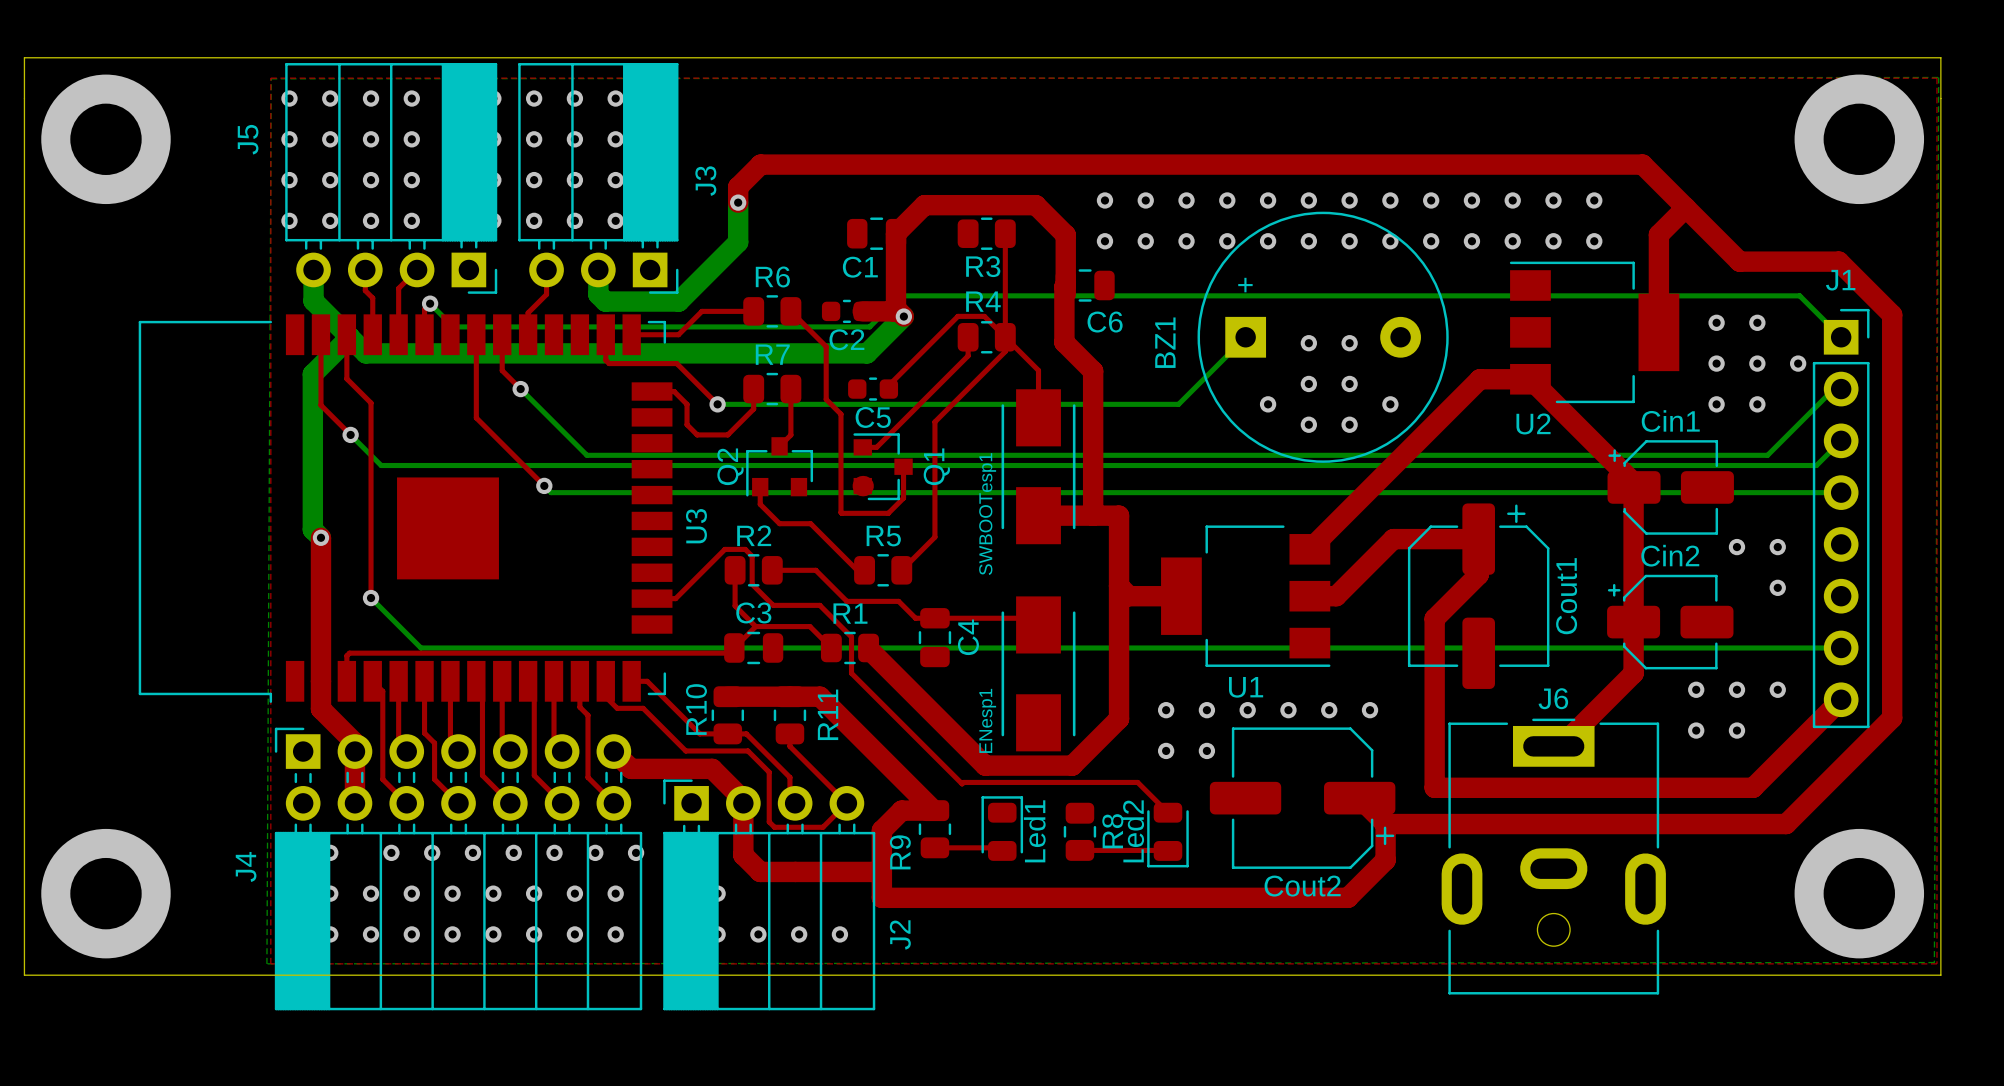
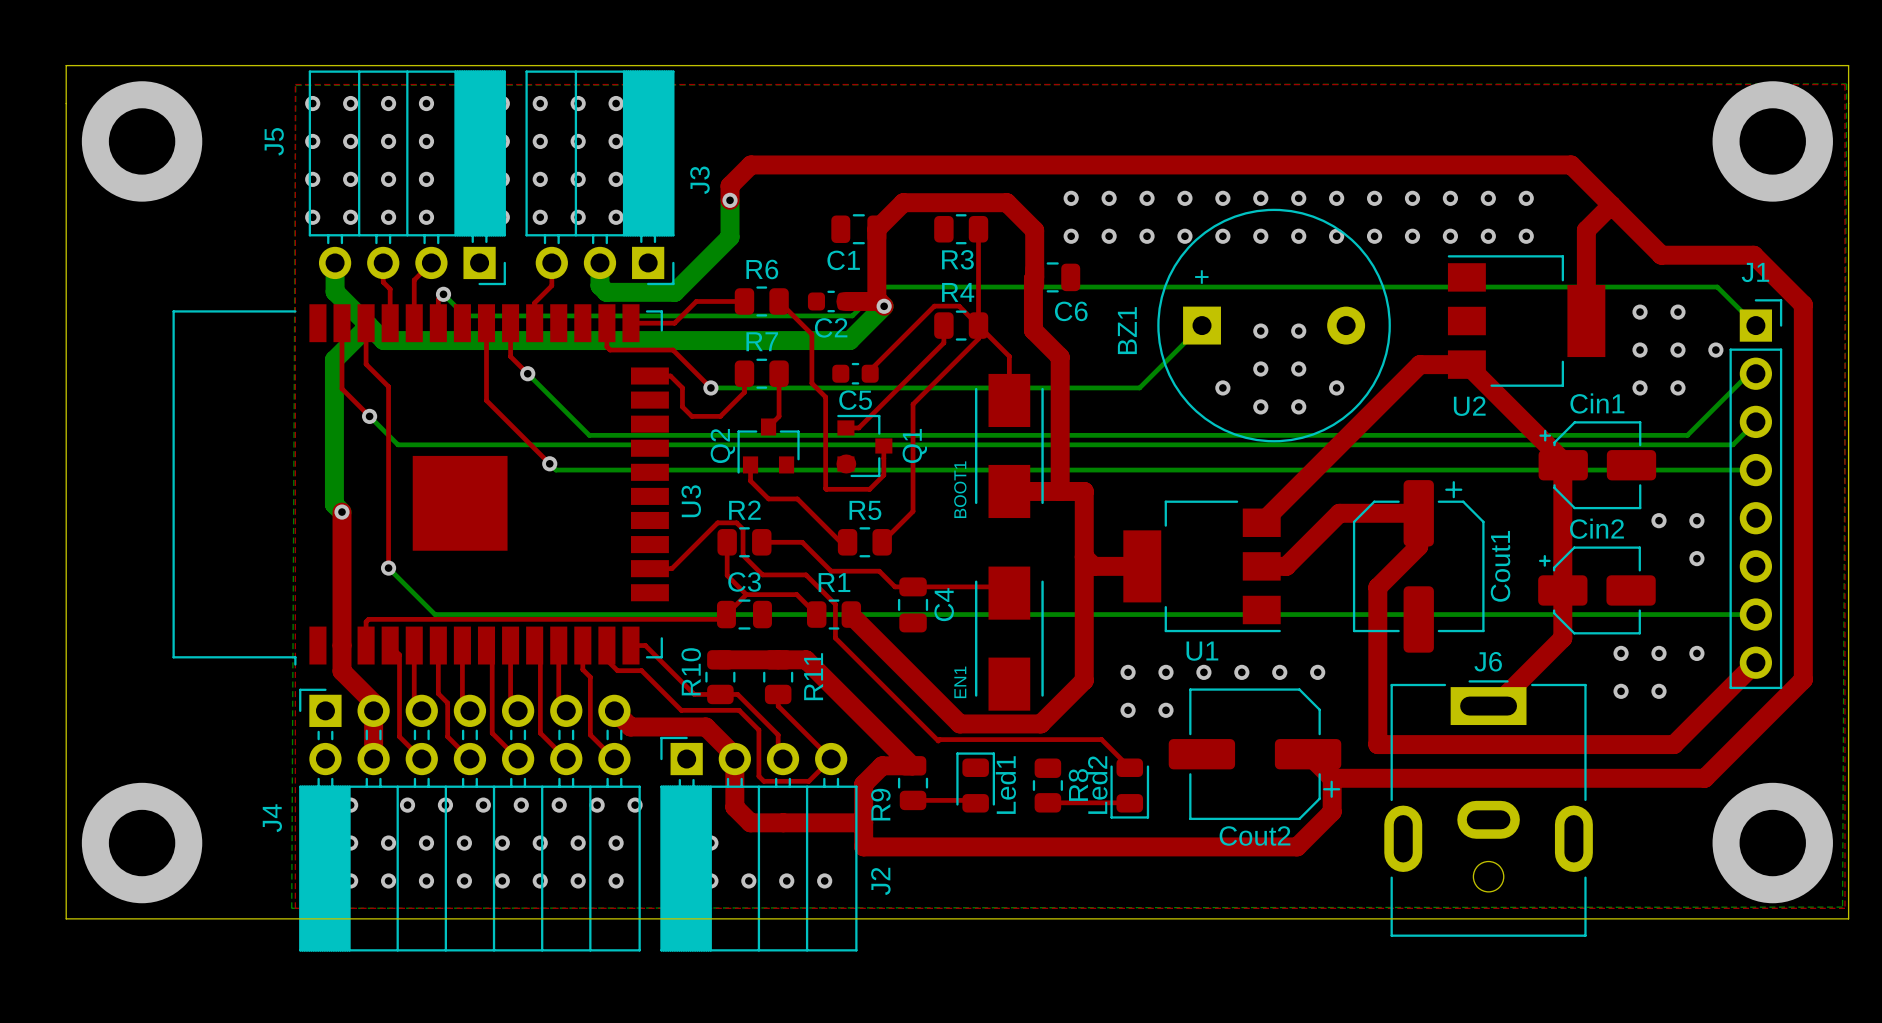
SWBOOTesp1 name: SWBOOTesp1 (987, 514) -> BOOT1 (960, 489)
ENesp1 name: ENesp1 (987, 720) -> EN1 (960, 682)

